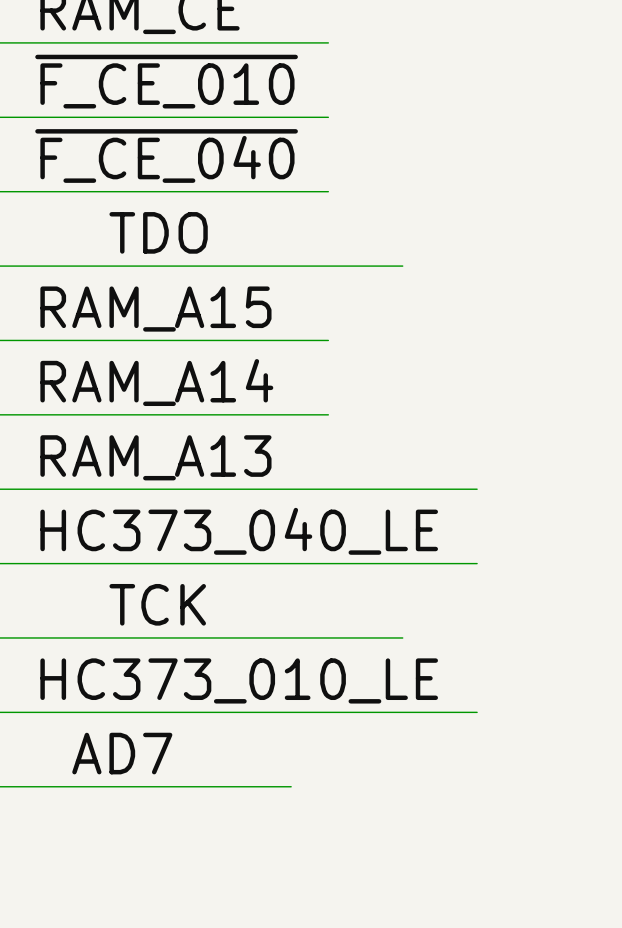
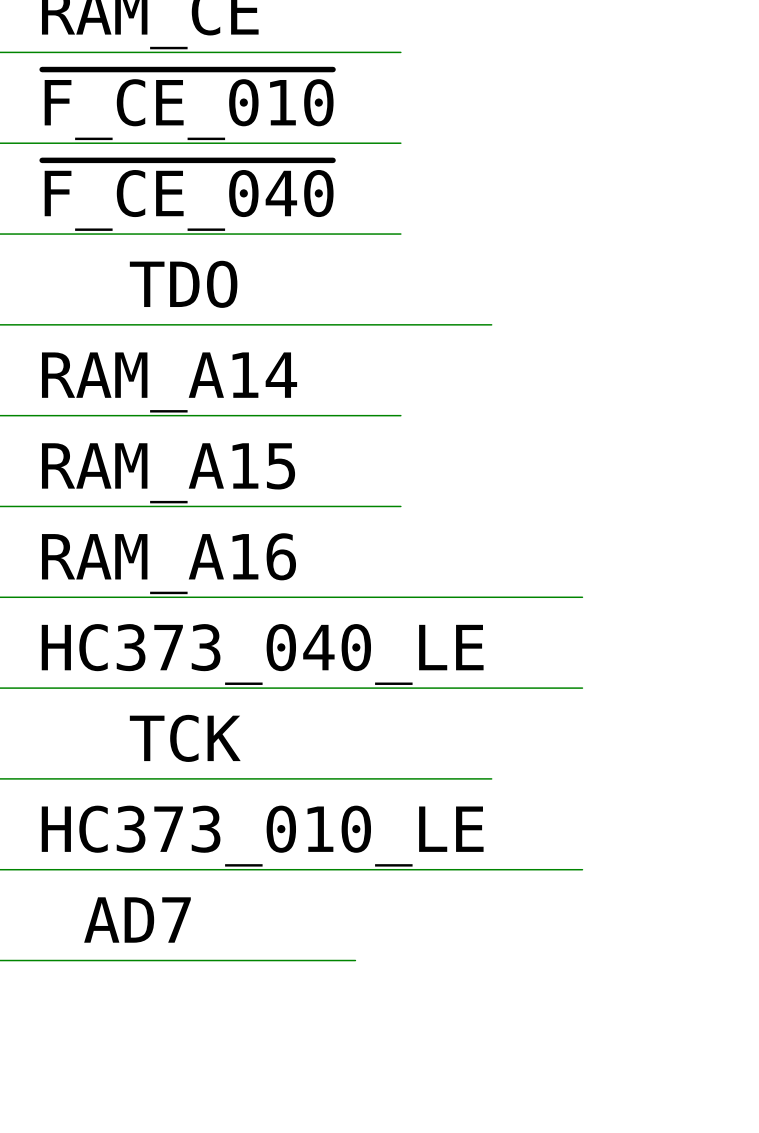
label: RAM_A15 (155, 309) -> RAM_A14 (169, 382)
label: RAM_A14 (156, 382) -> RAM_A15 (168, 473)
label: RAM_A13 (155, 457) -> RAM_A16 (169, 563)

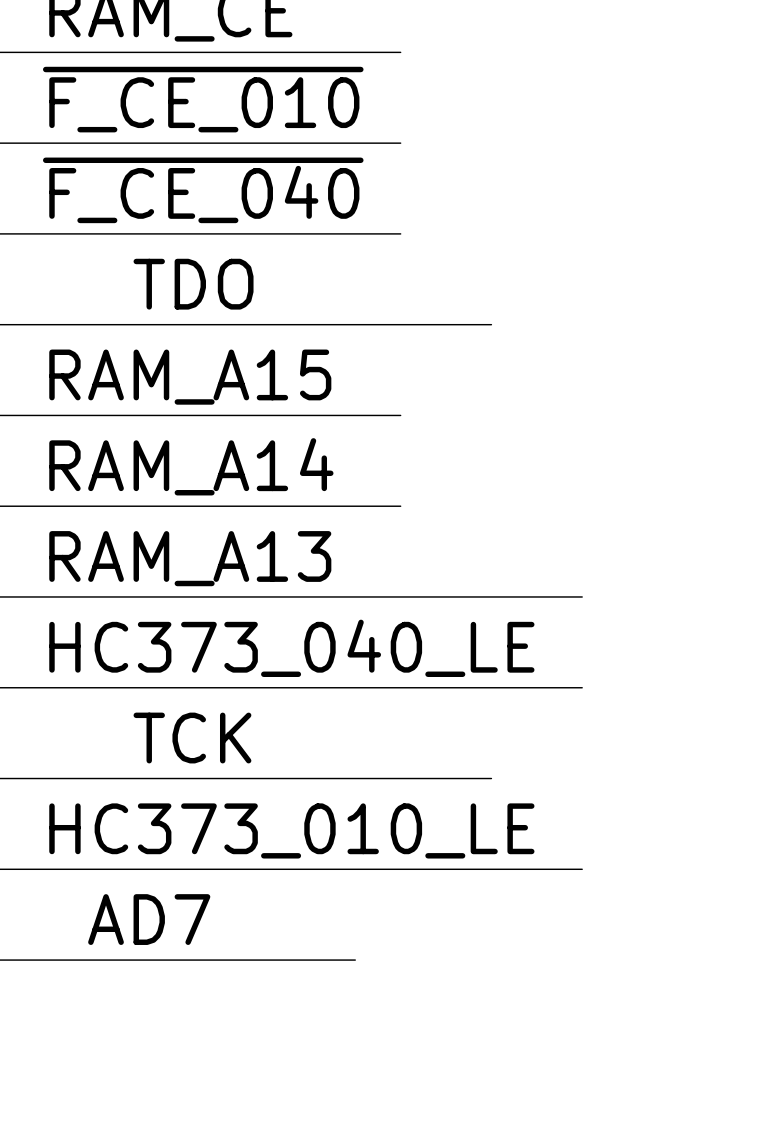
label: RAM_A14 (169, 382) -> RAM_A15 (190, 377)
label: RAM_A15 (168, 473) -> RAM_A14 (191, 466)
label: RAM_A16 (169, 563) -> RAM_A13 (190, 558)

